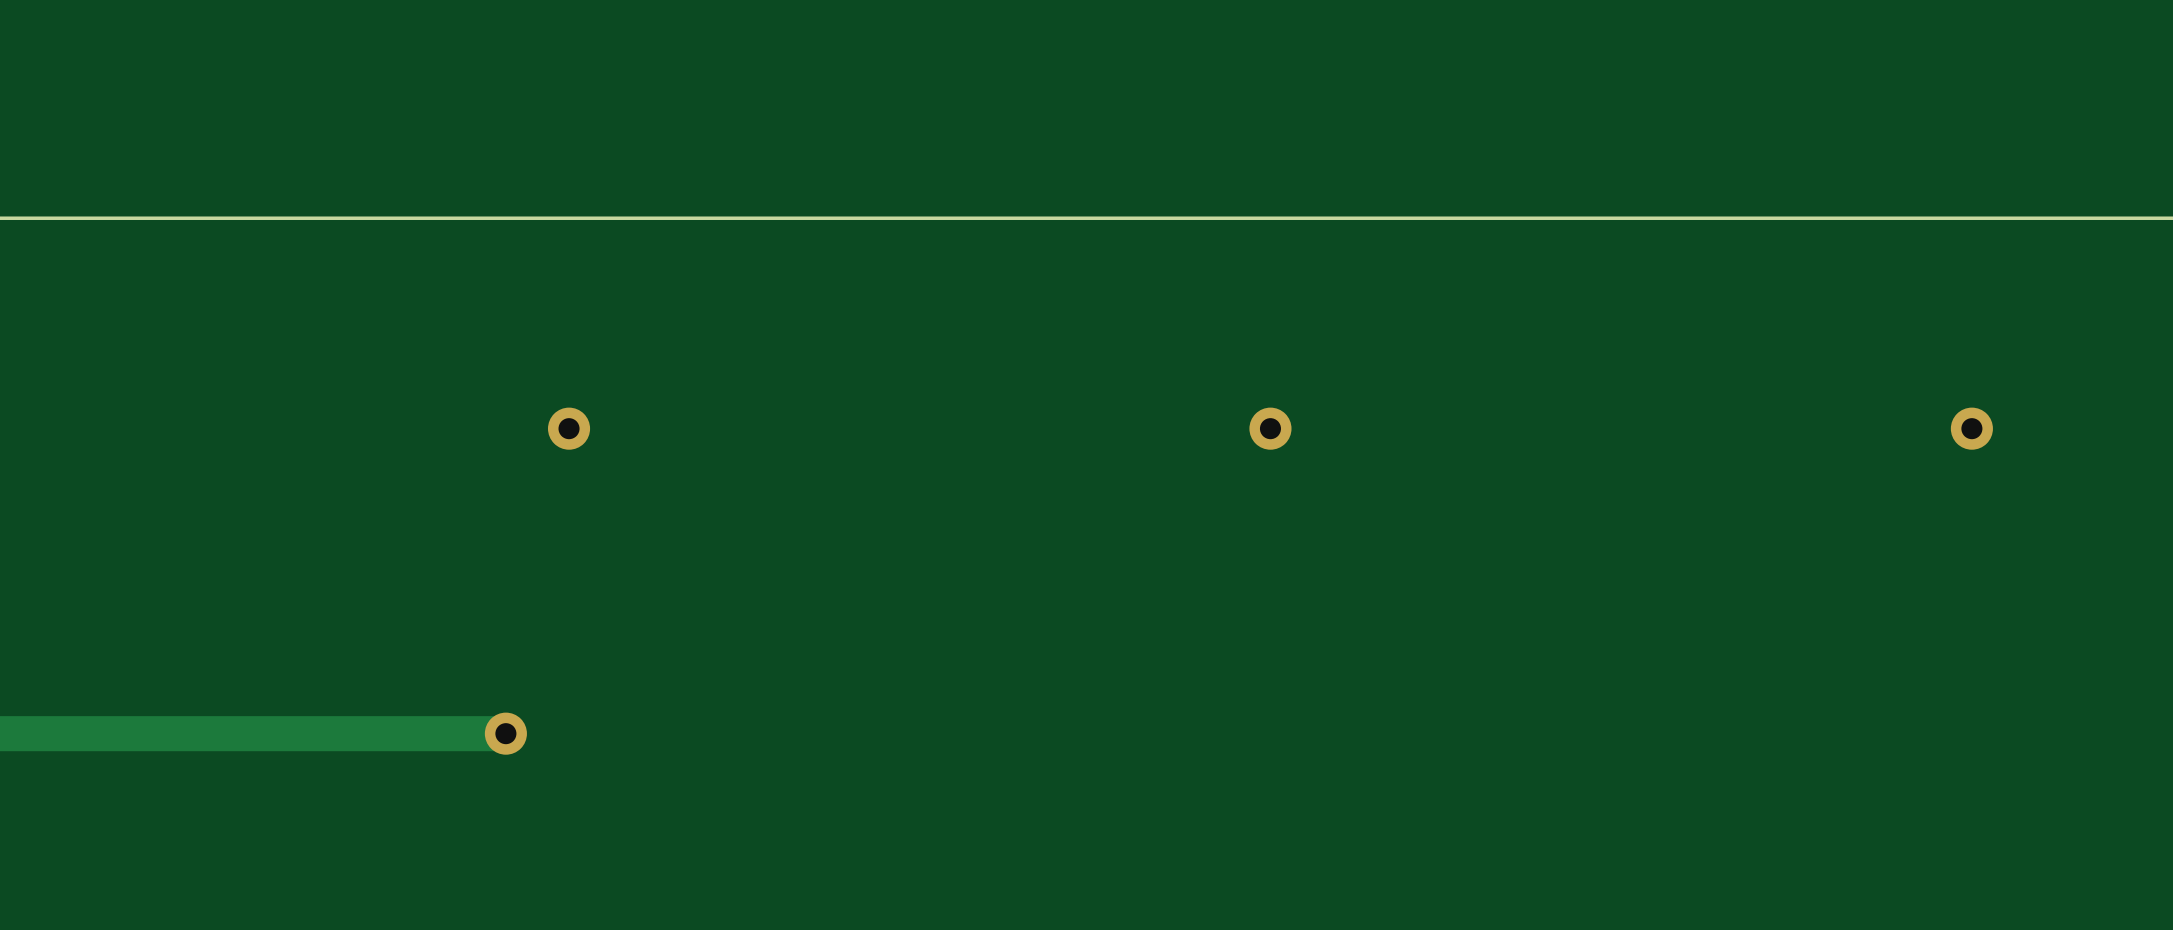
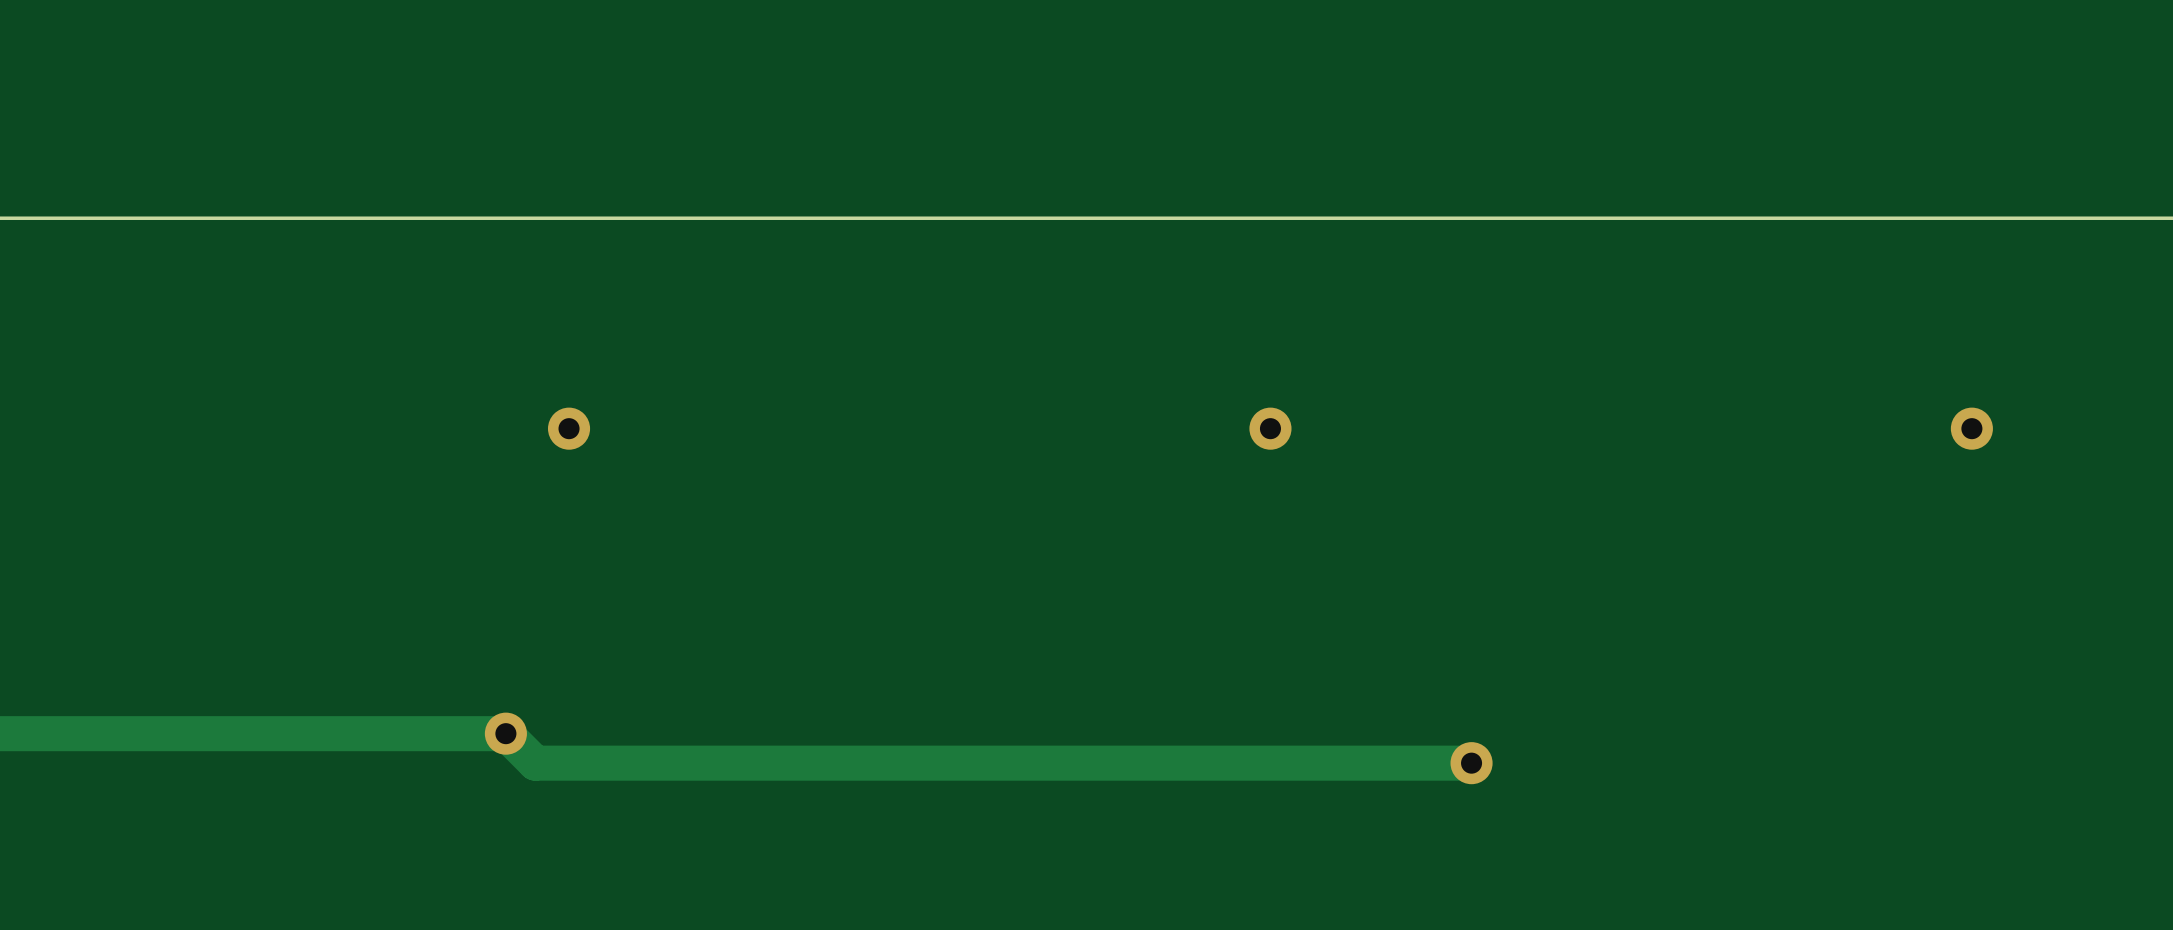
track: none -> (505, 733) (535, 763) (1471, 763)
via: none -> (1471, 763)

